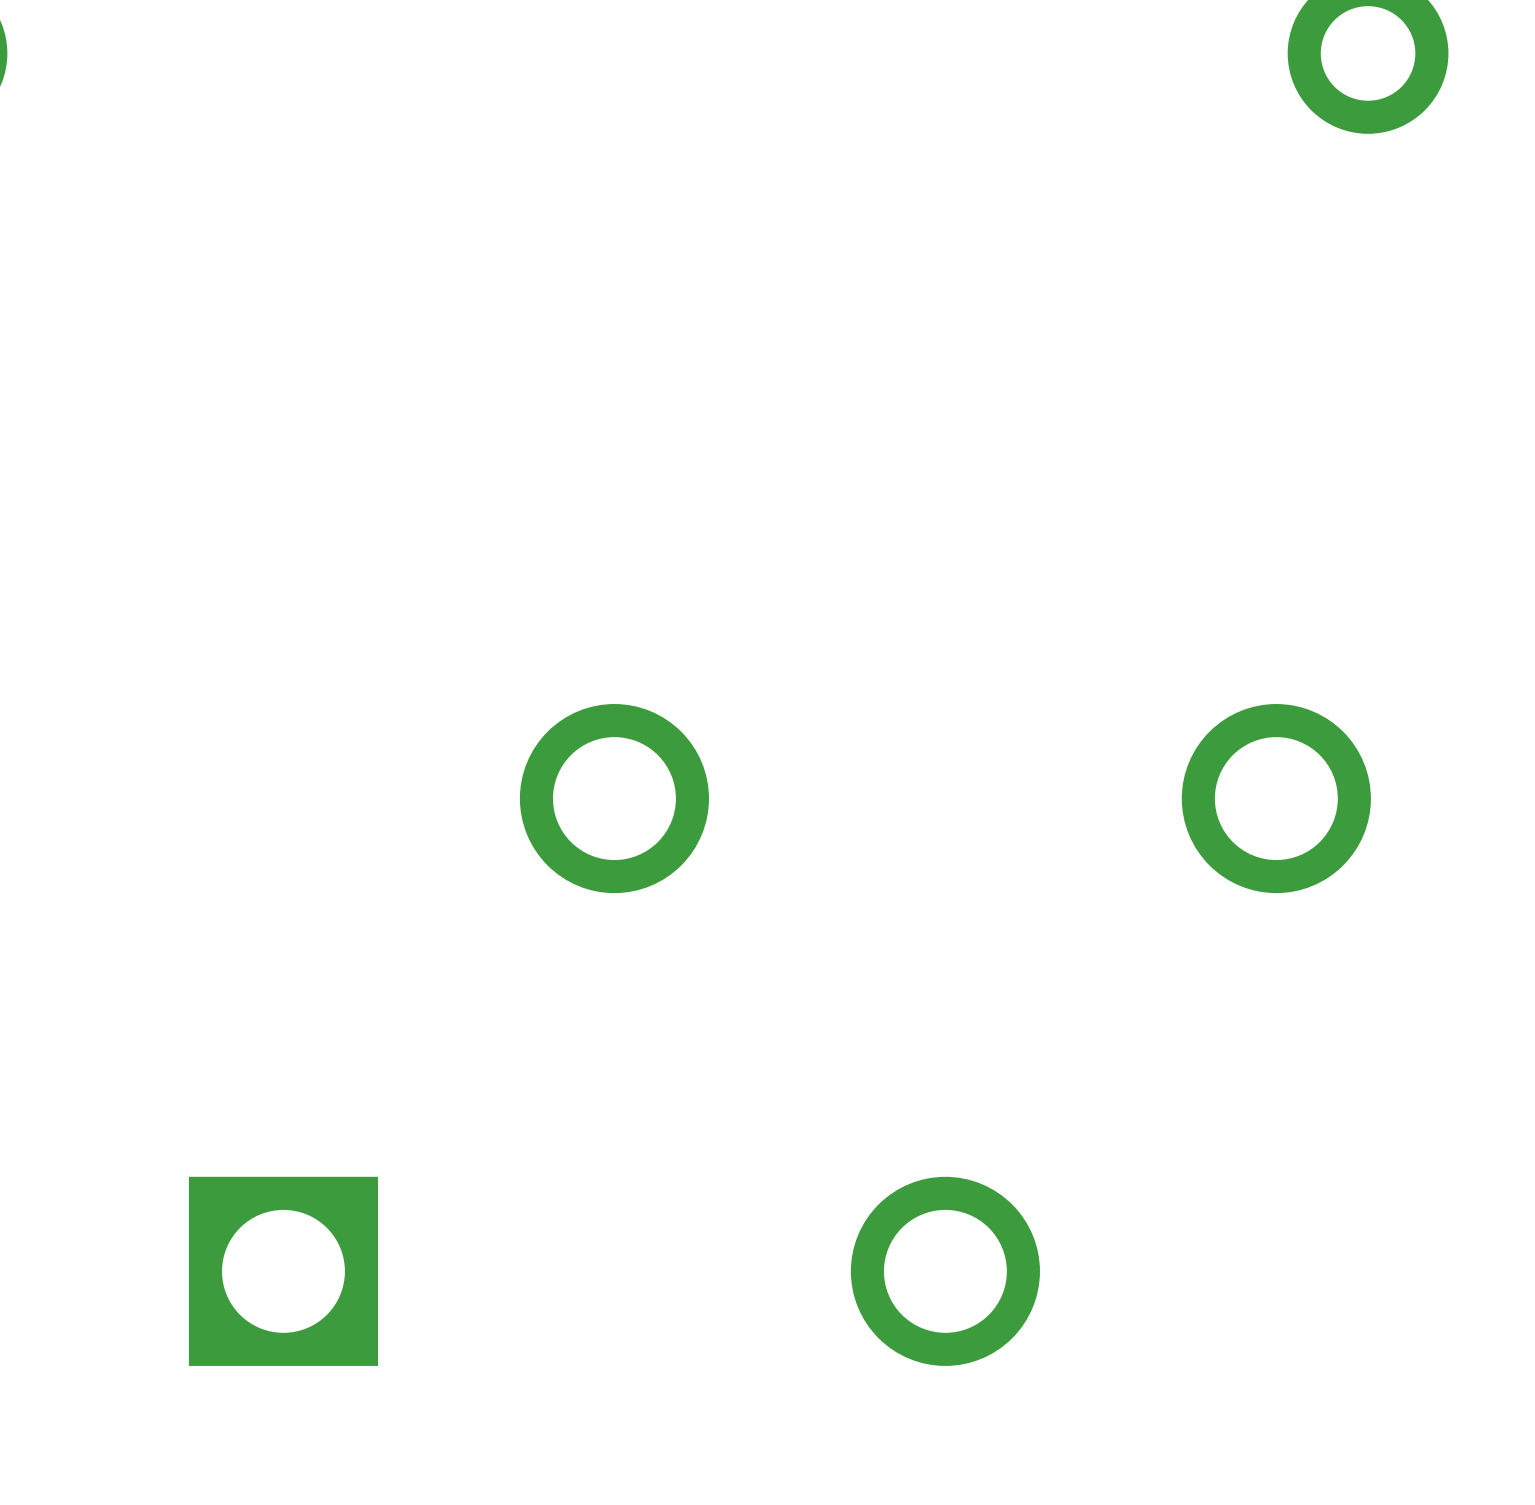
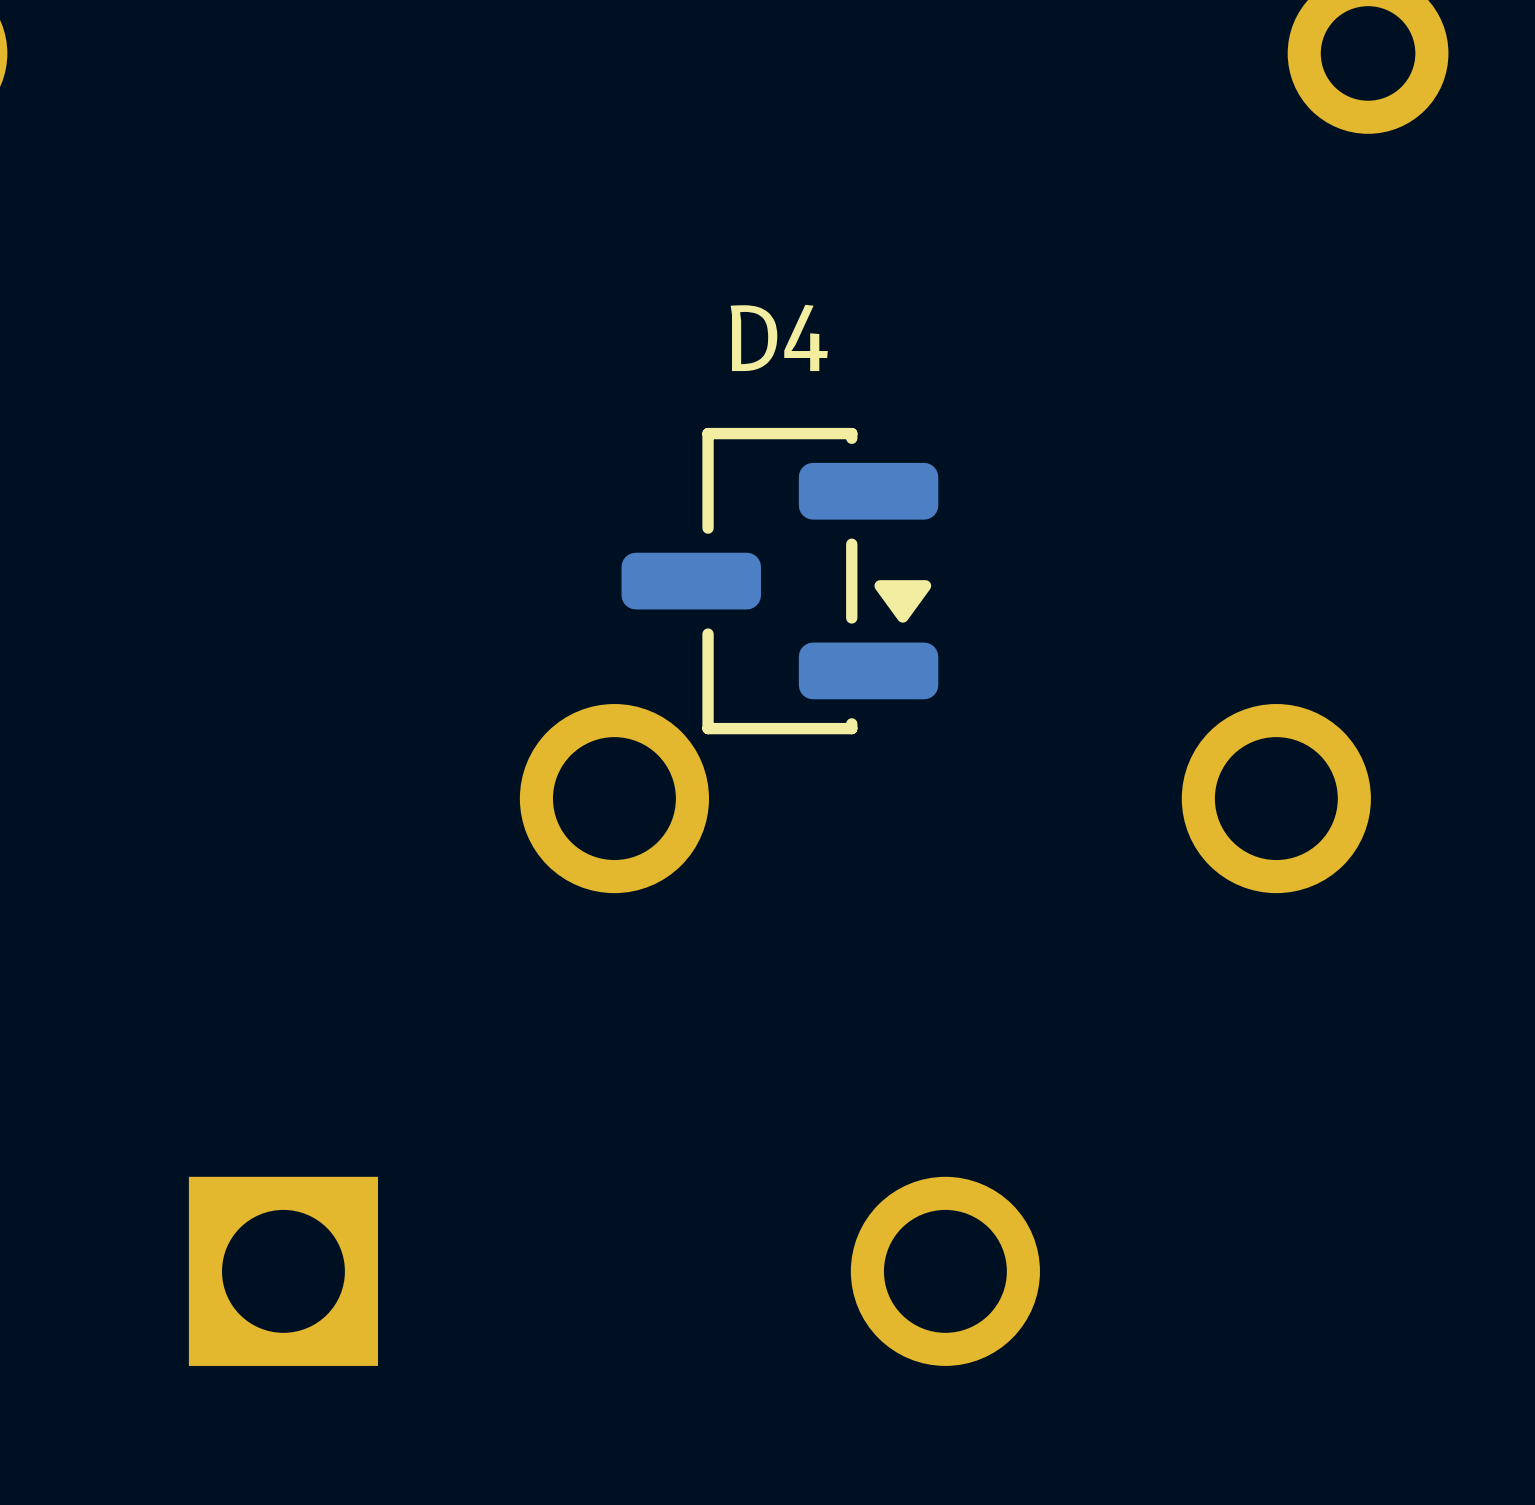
D4: none -> (779, 581)

